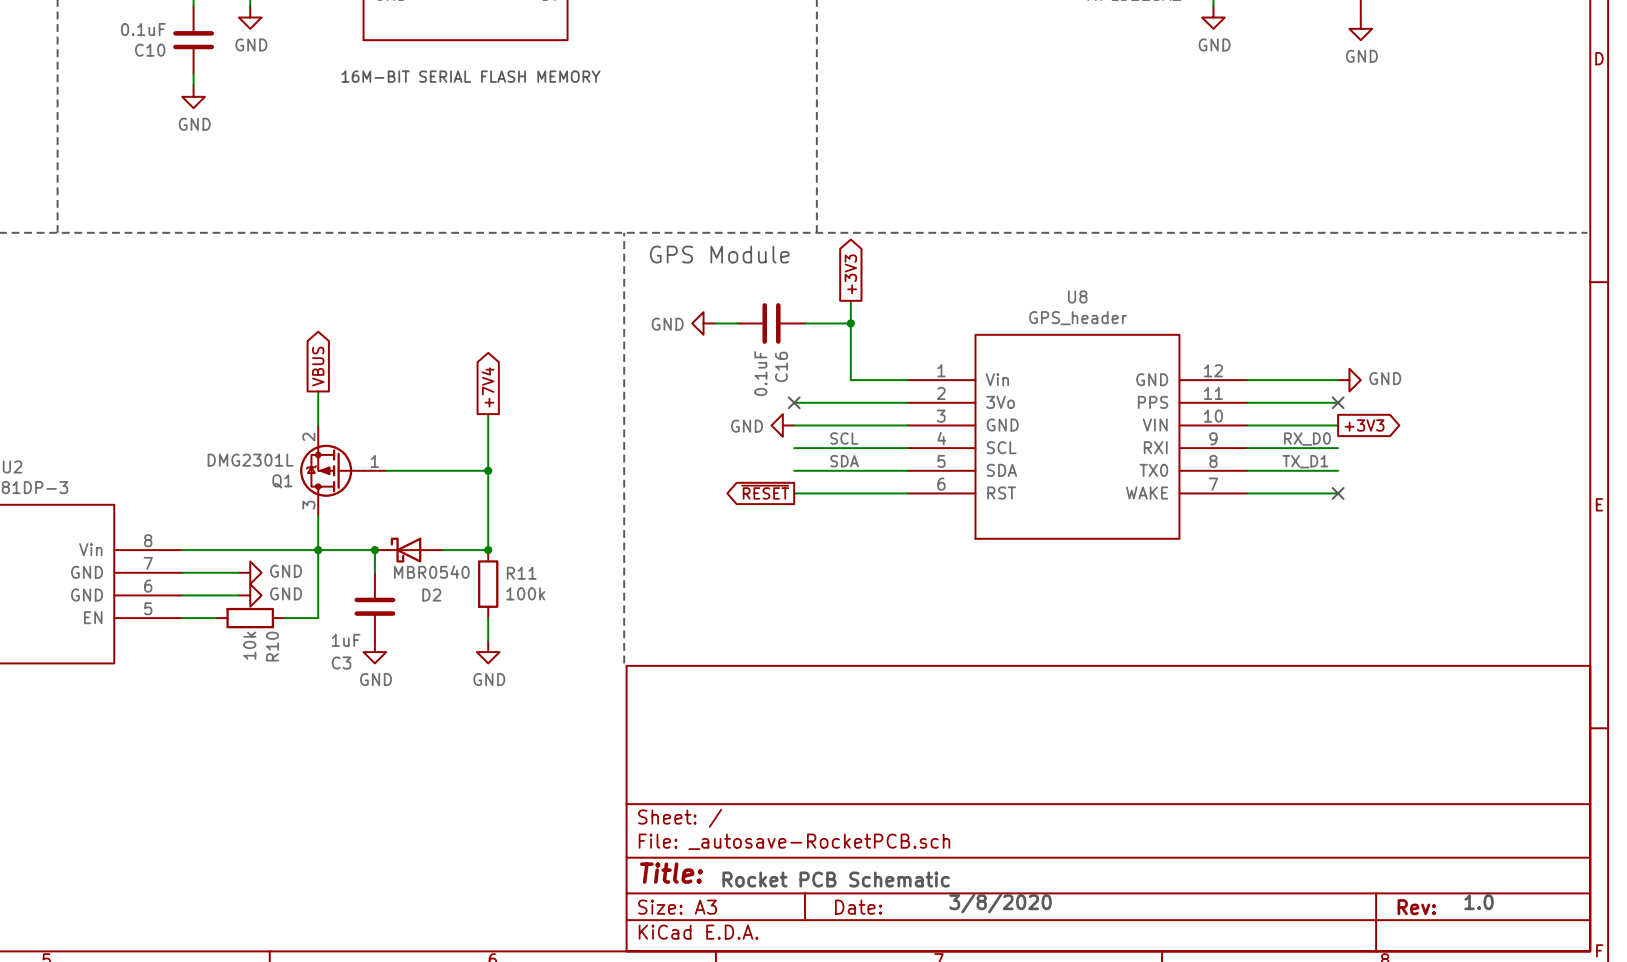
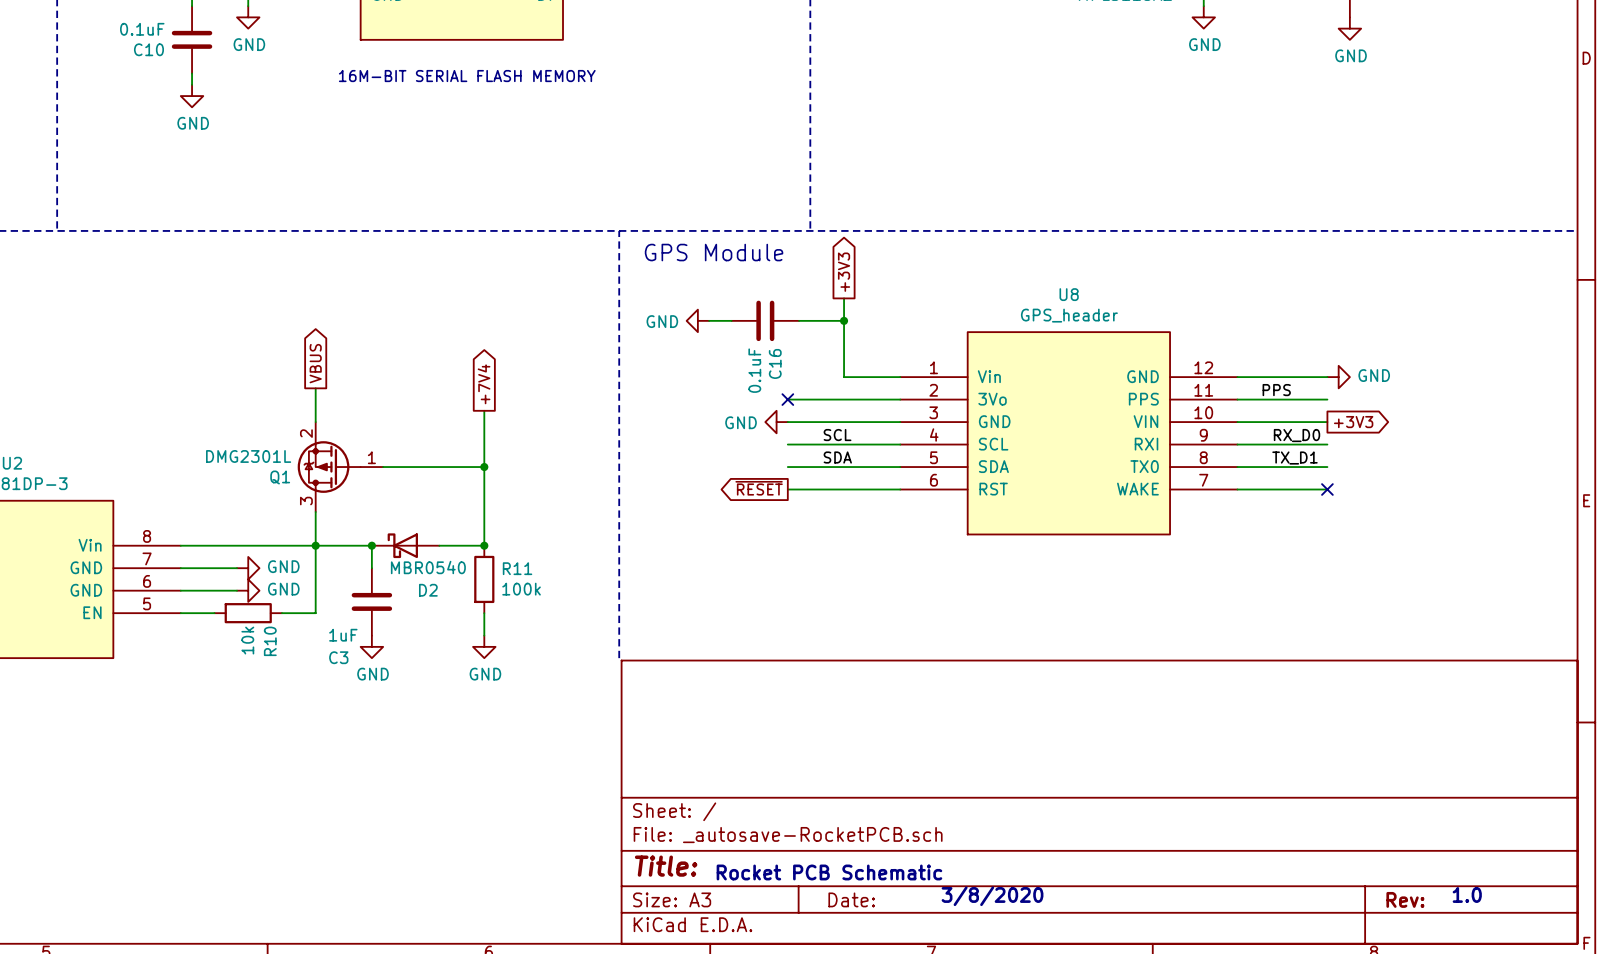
label: none -> PPS (1276, 390)
no-connect mark: (1338, 402) -> none

